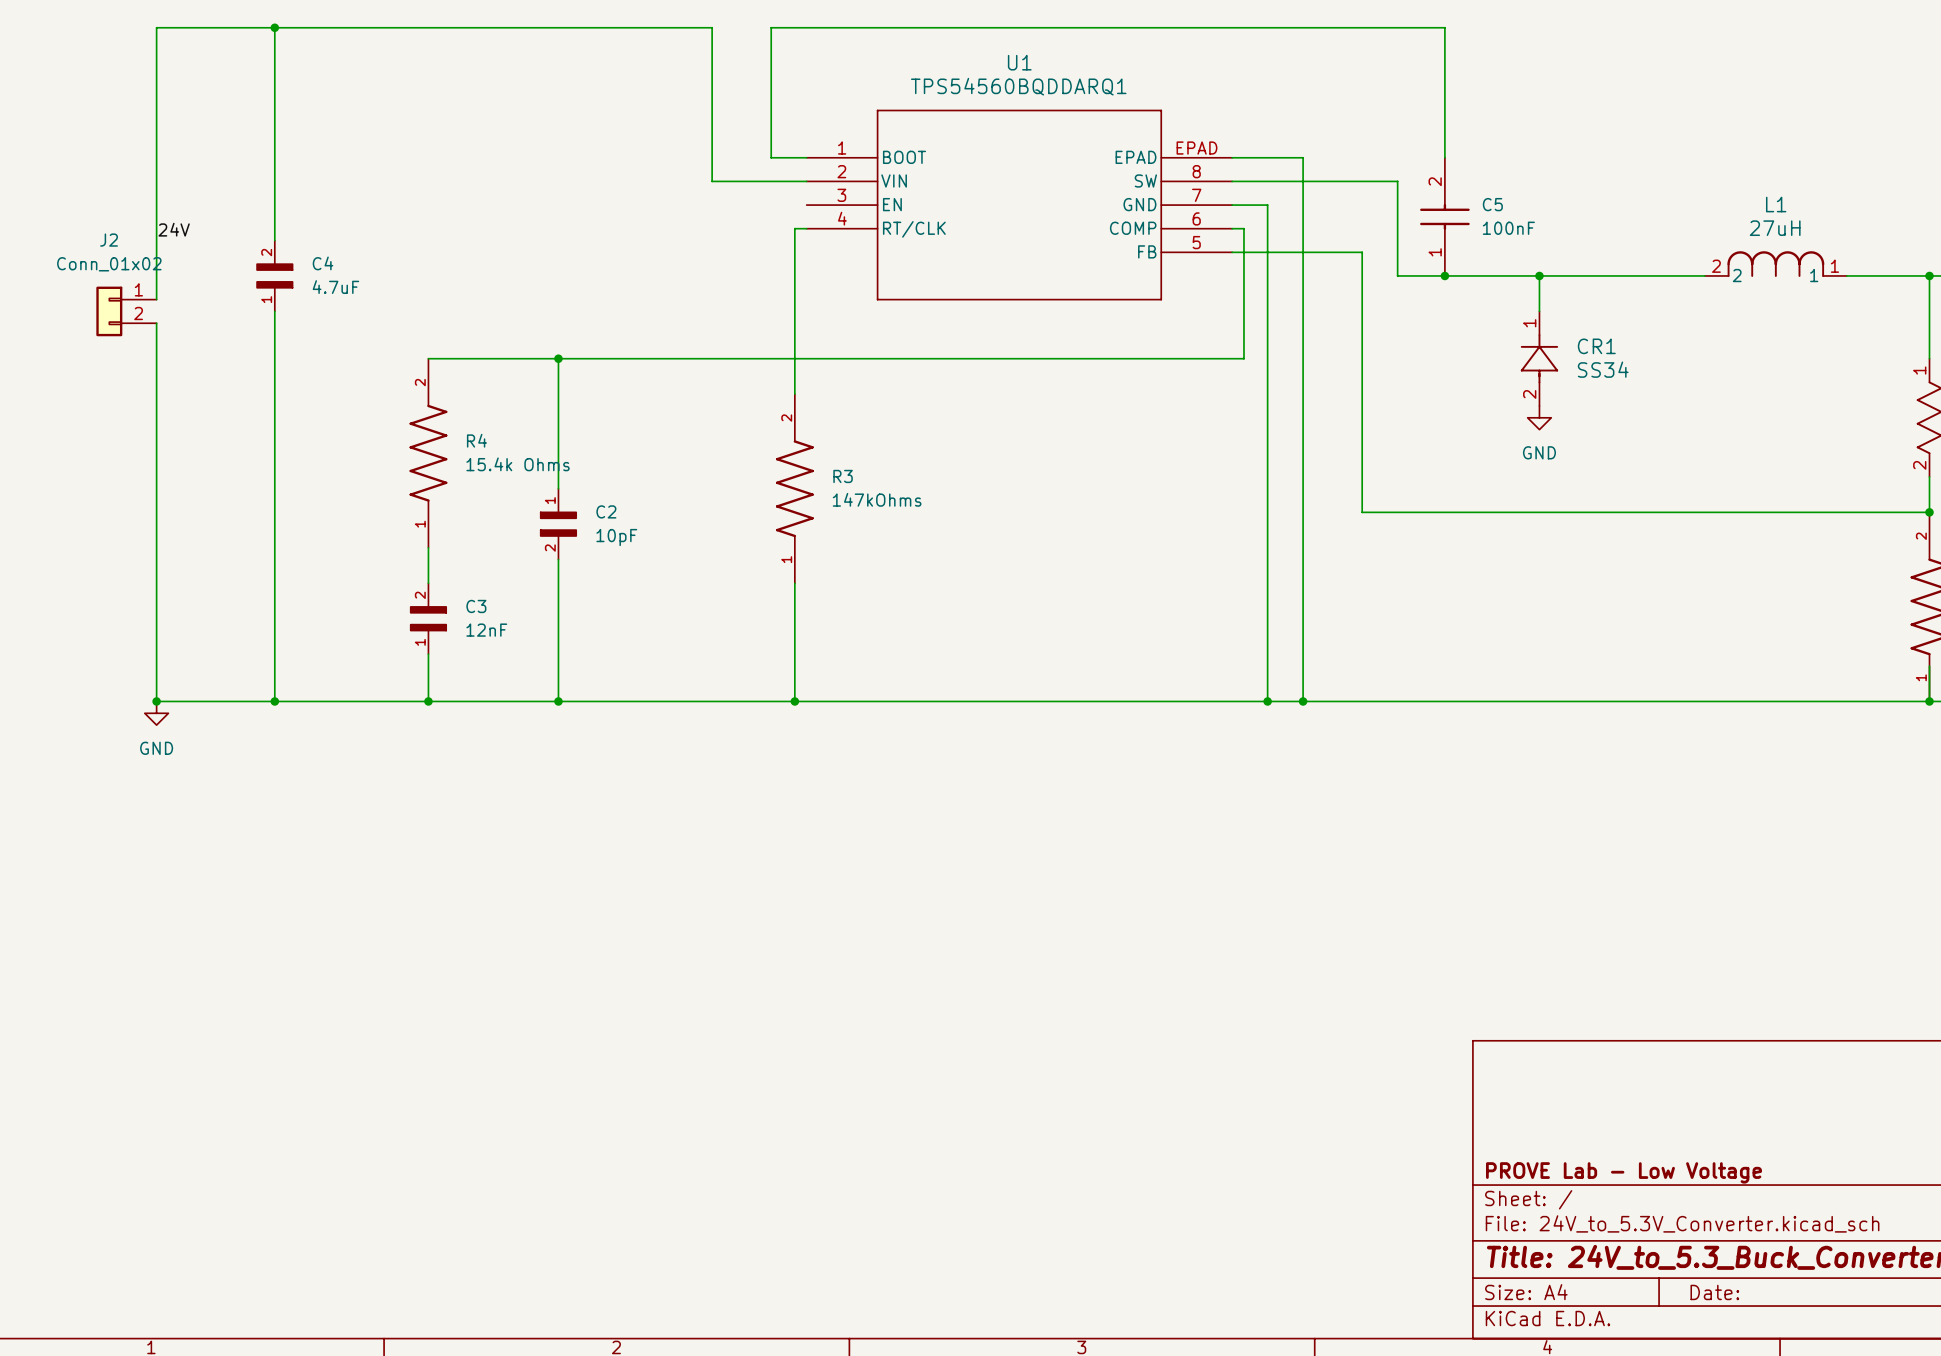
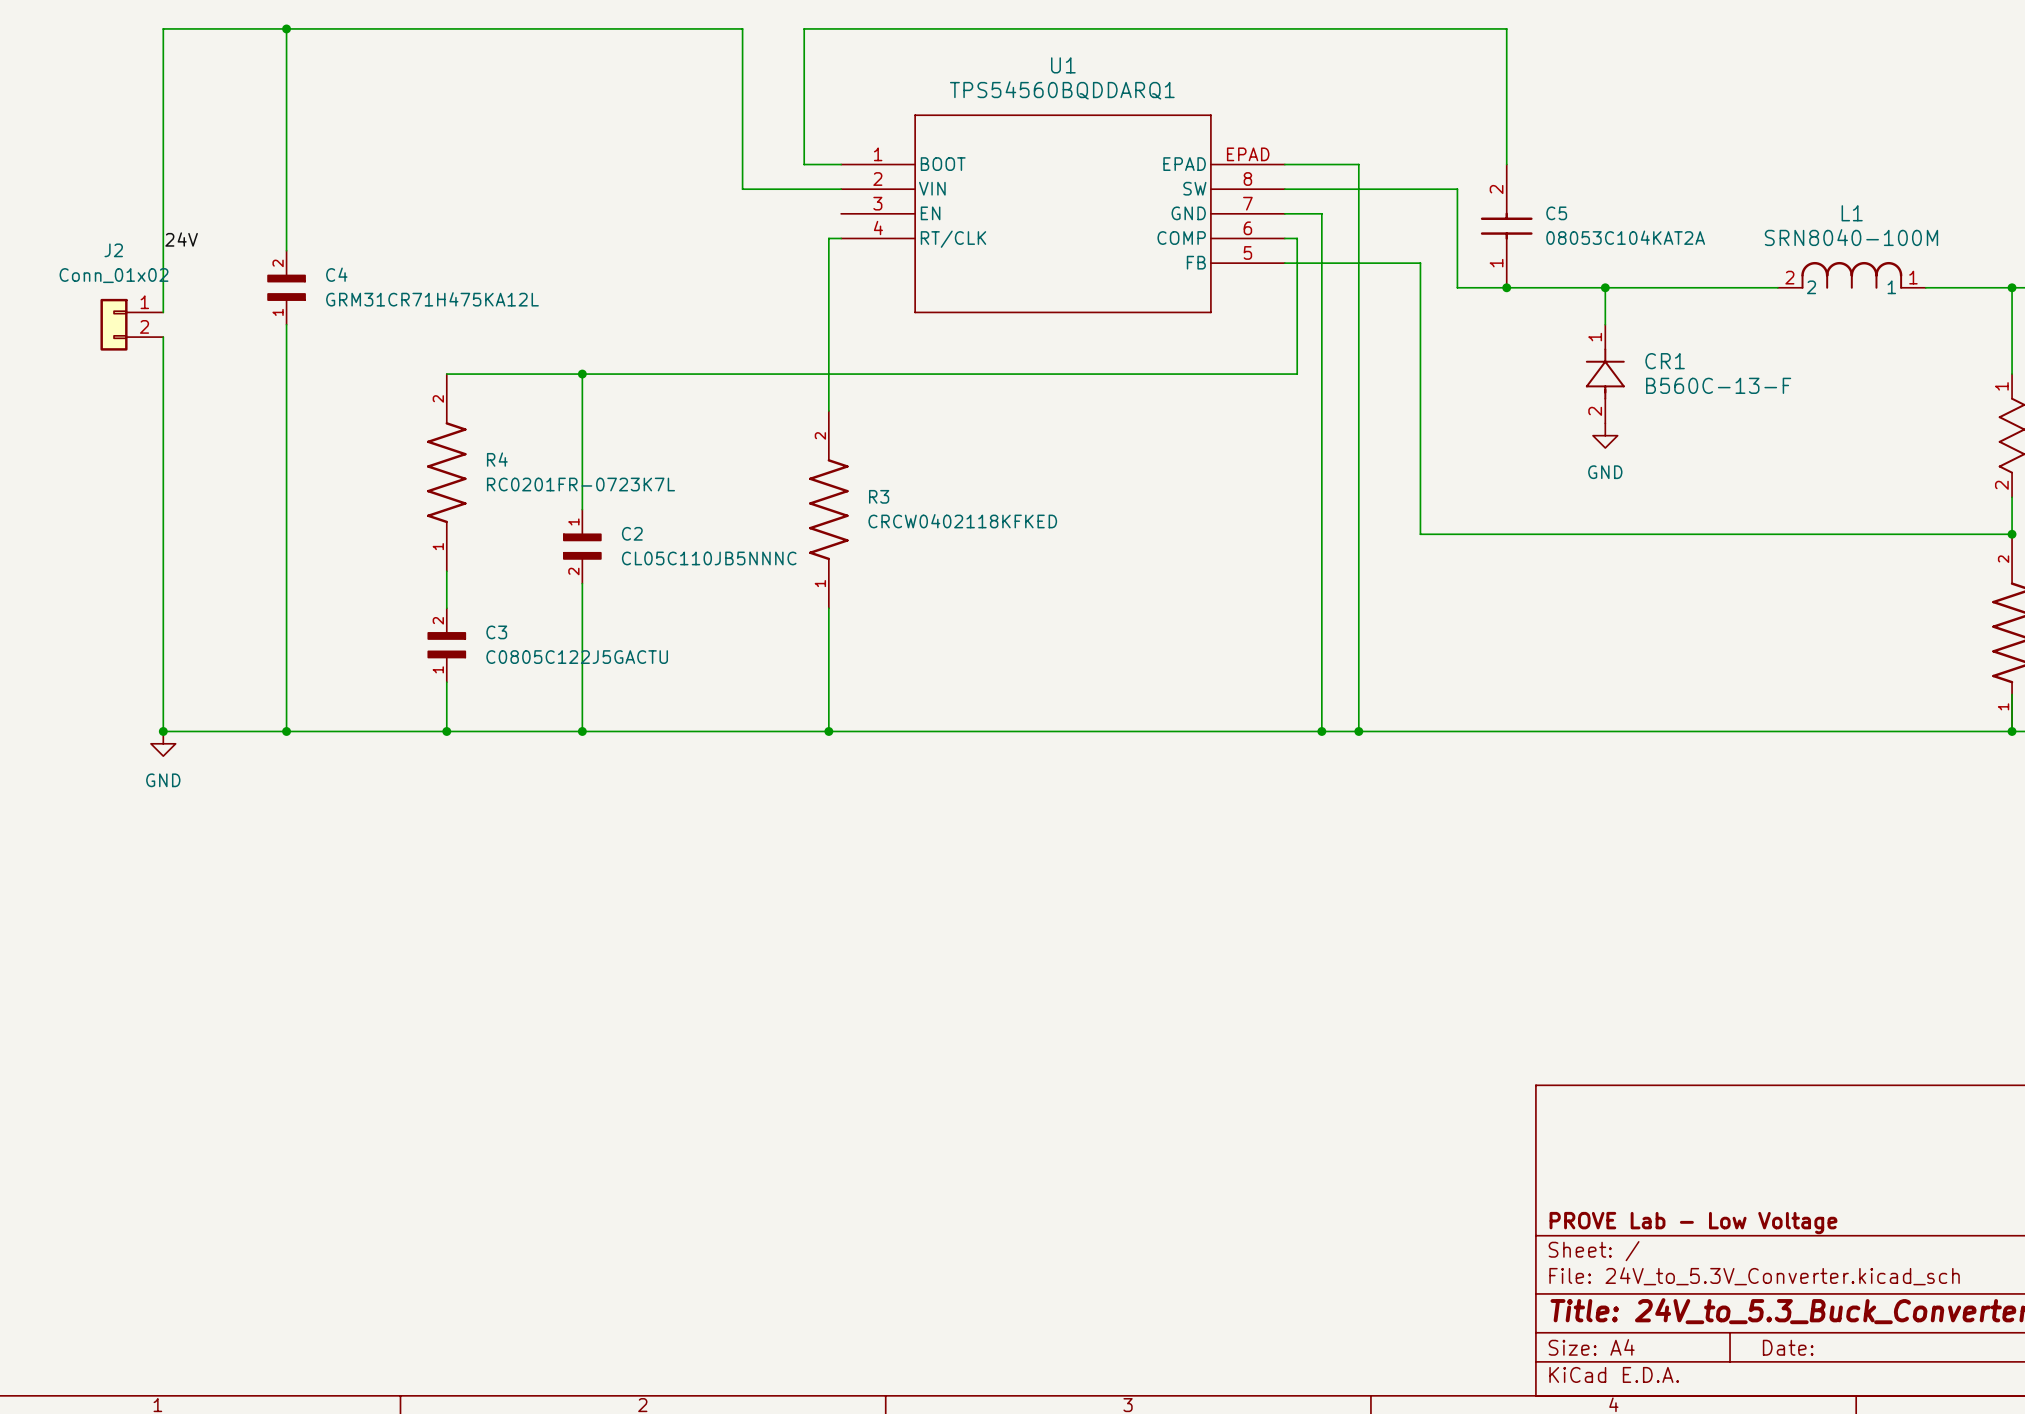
C5 value: 100nF (1508, 228) -> 08053C104KAT2A (1625, 237)
L1 value: 27uH (1775, 228) -> SRN8040-100M (1851, 237)
C4 value: 4.7uF (335, 287) -> GRM31CR71H475KA12L (432, 299)
CR1 value: SS34 (1603, 369) -> B560C-13-F (1718, 385)
R4 value: 15.4k Ohms (518, 464) -> RC0201FR-0723K7L (580, 484)
R3 value: 147kOhms (877, 499) -> CRCW0402118KFKED (962, 521)
C2 value: 10pF (616, 537) -> CL05C110JB5NNNC (709, 558)
C3 value: 12nF (486, 630) -> C0805C122J5GACTU (577, 657)

